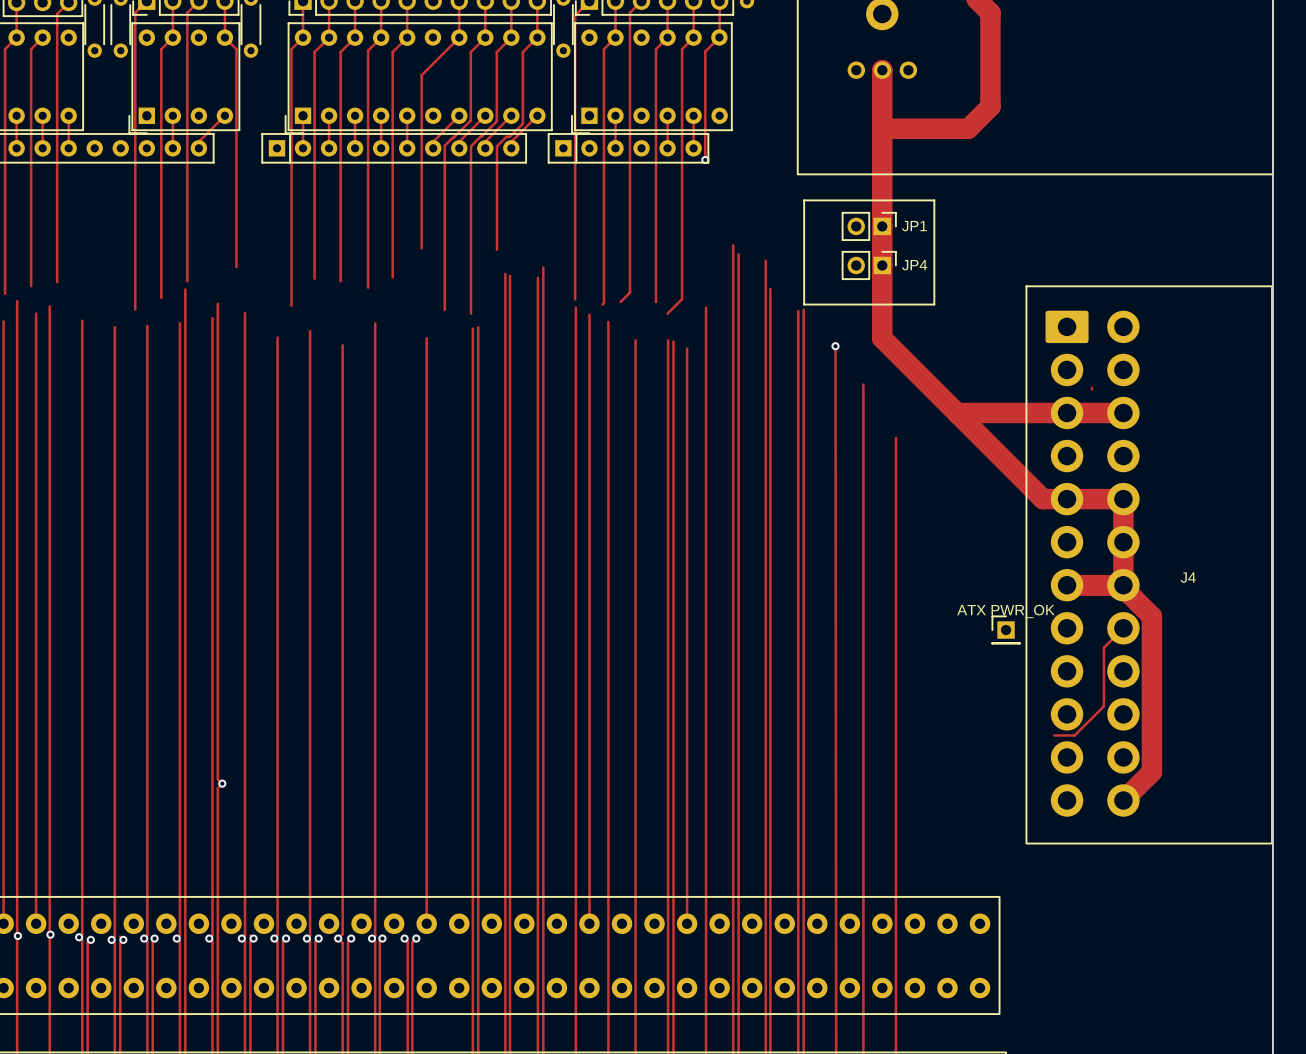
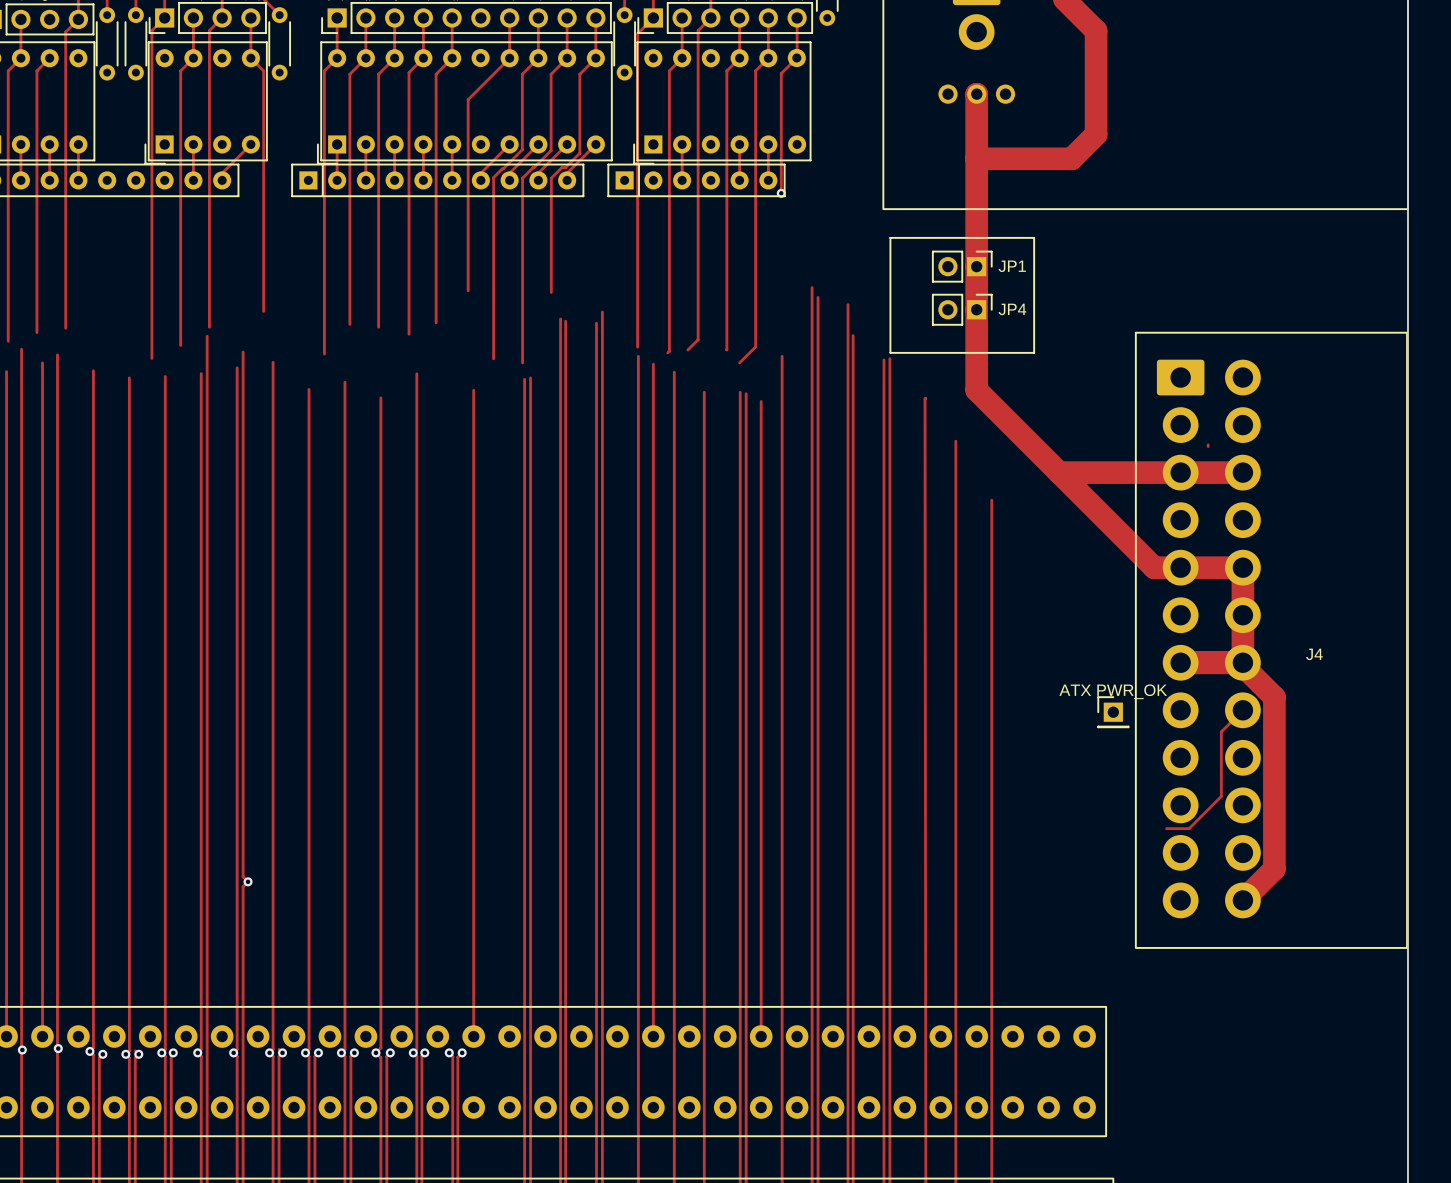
via: (835, 346) -> none

